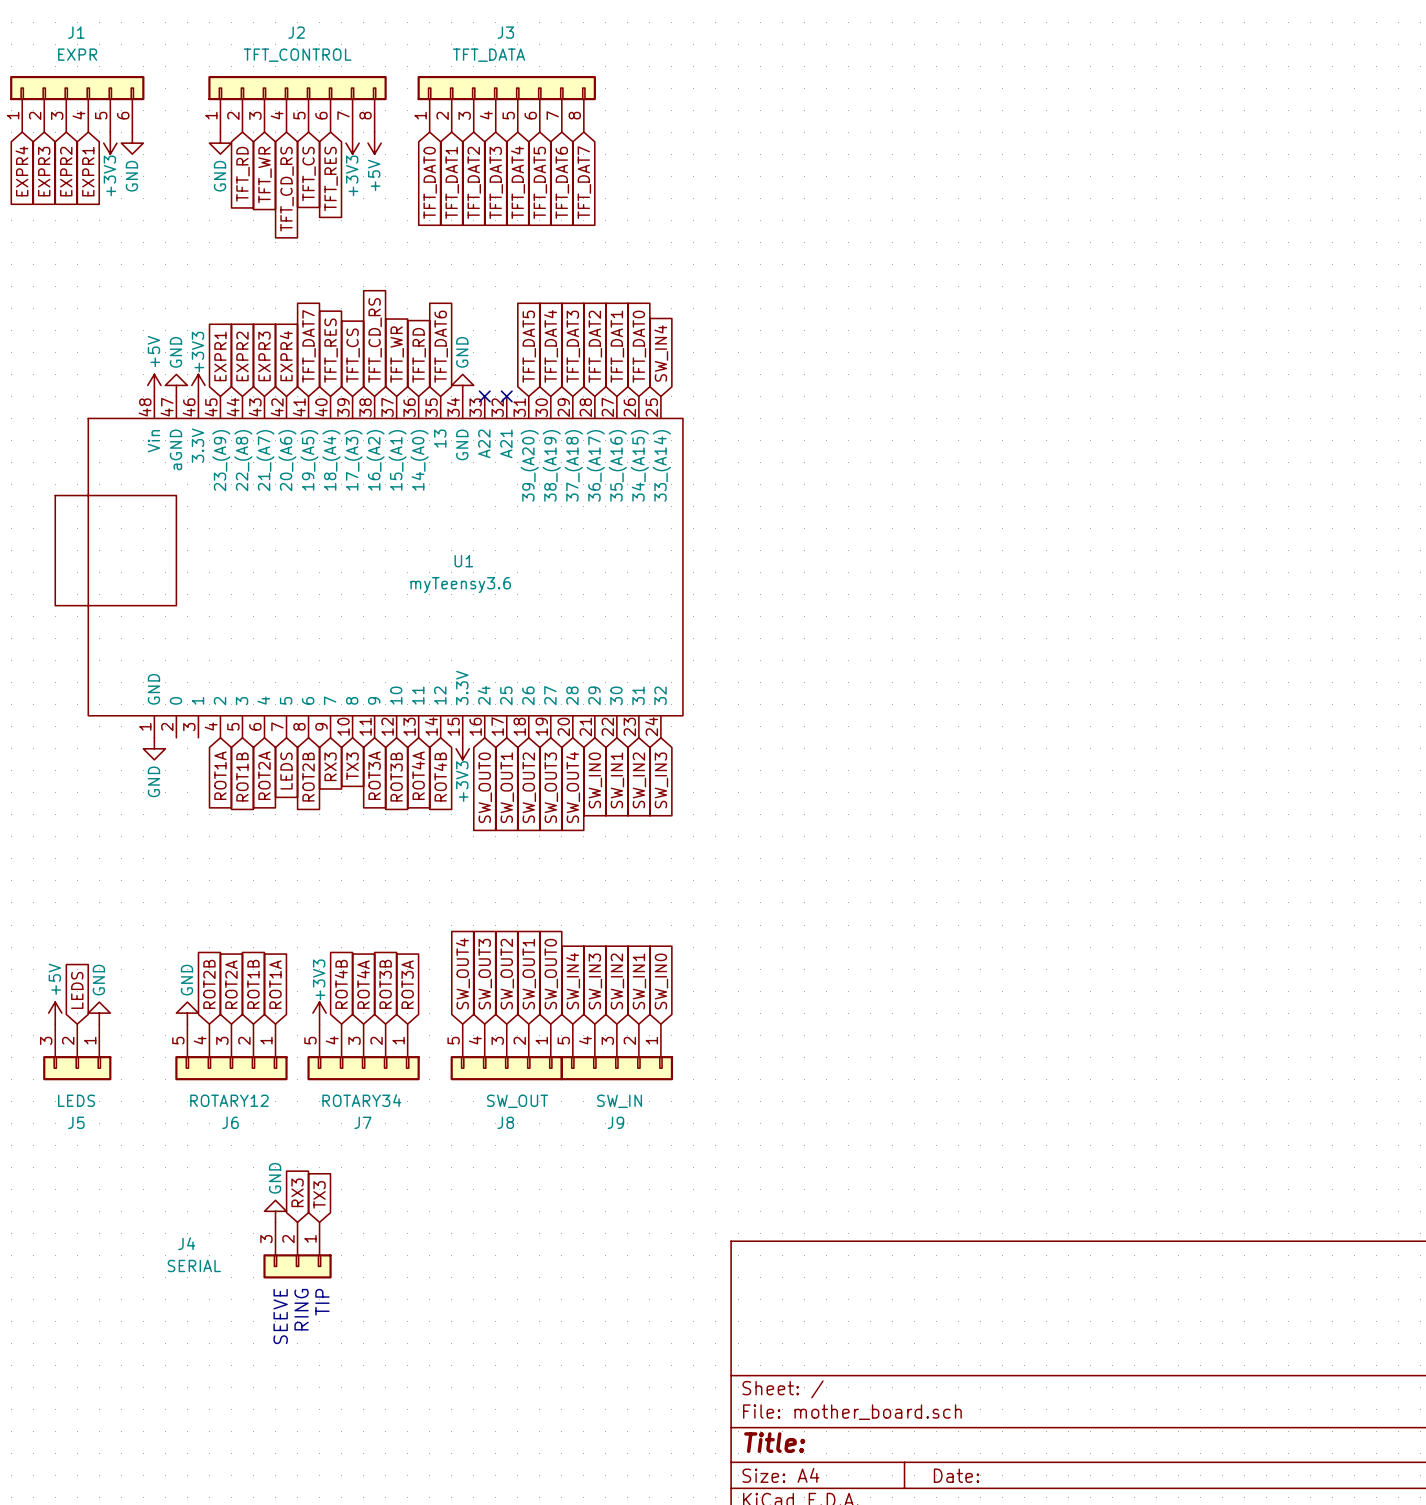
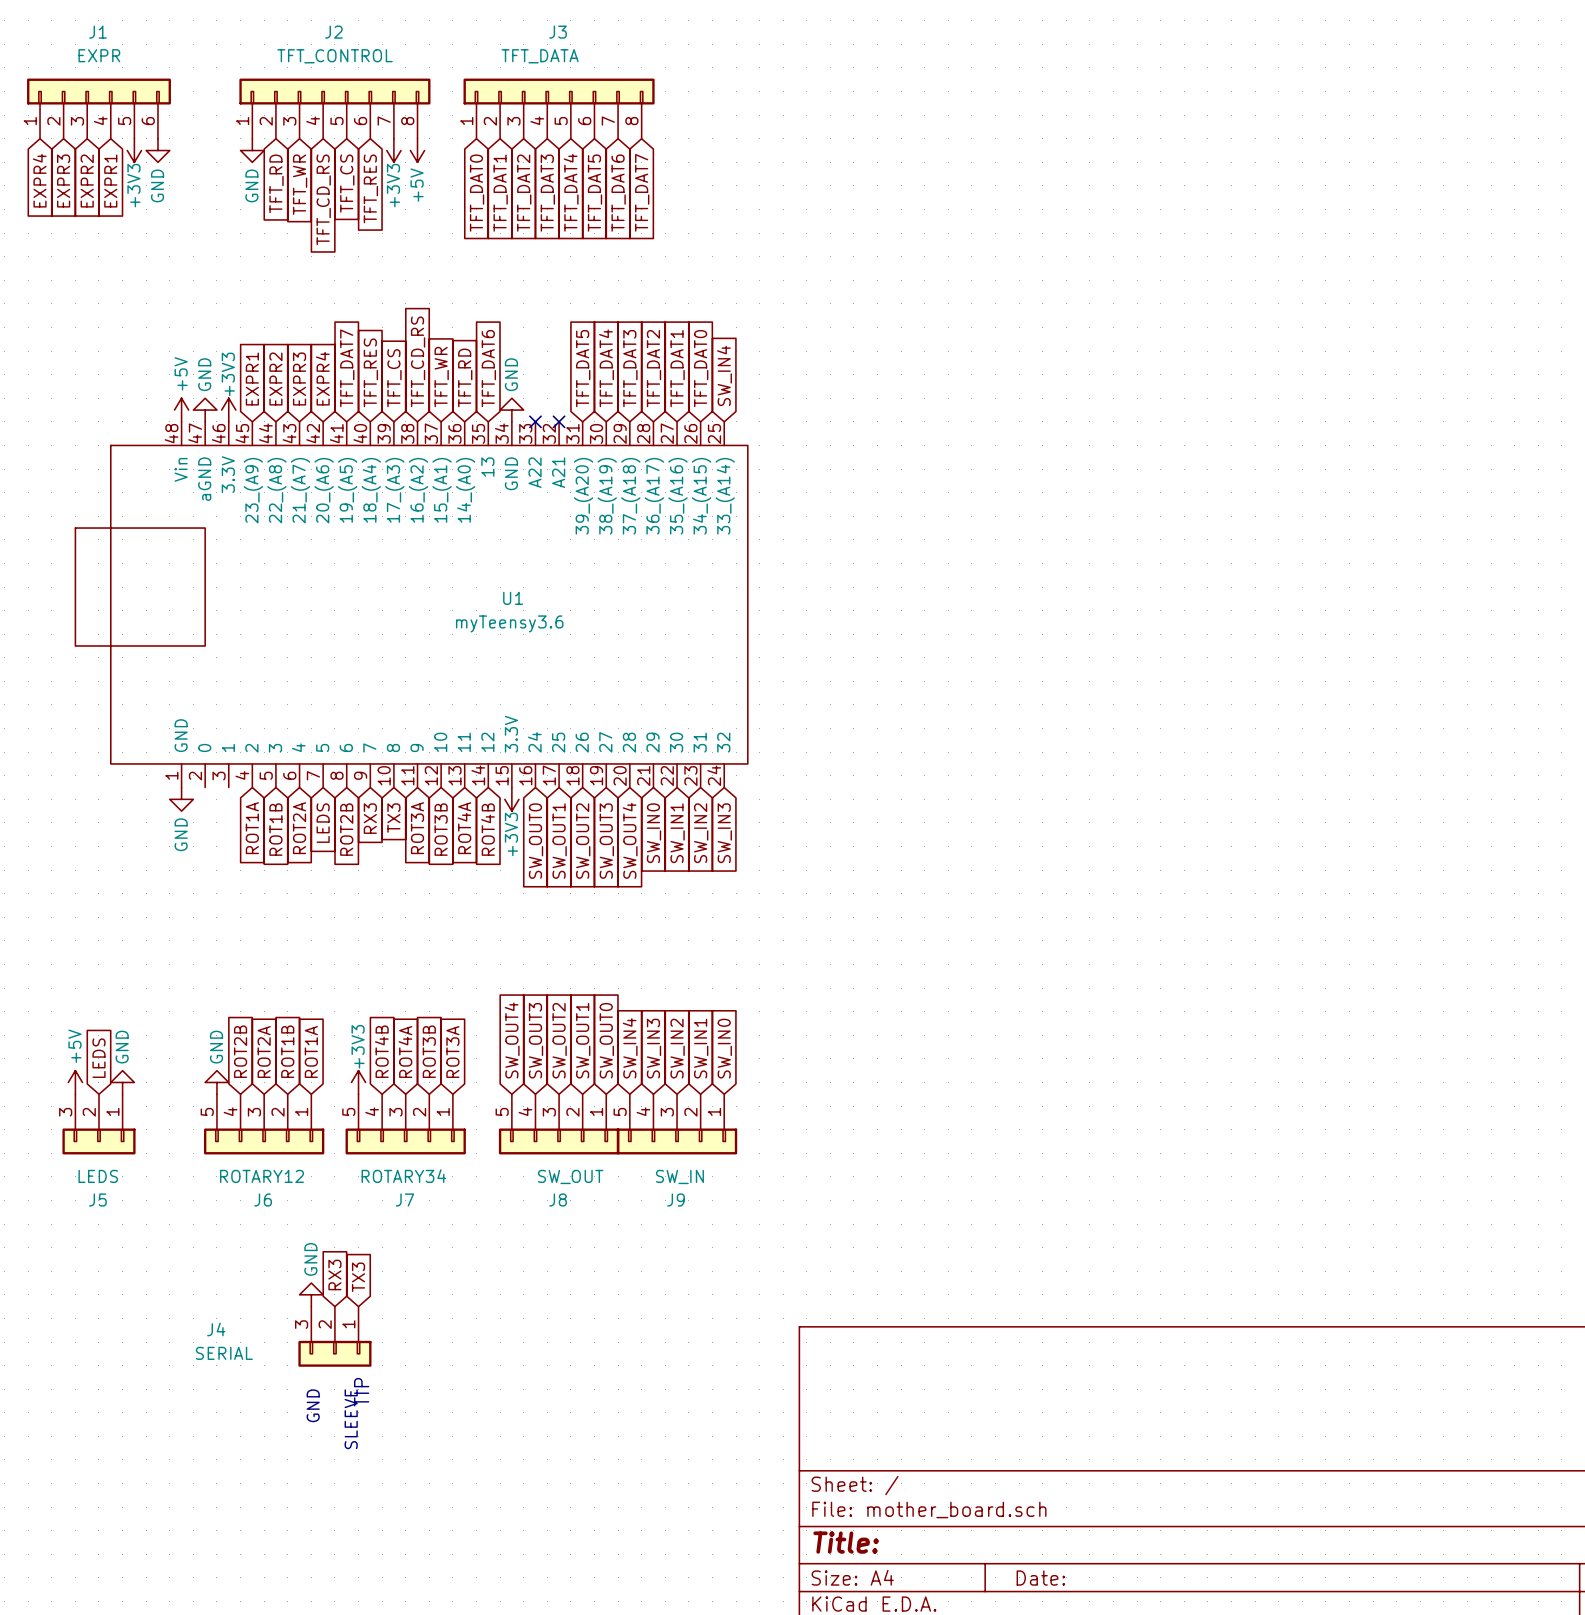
text: RING (301, 1309) -> none
text: none -> GND (313, 1405)
text: SEEVE (280, 1316) -> none
text: none -> SLEEVE (351, 1419)

